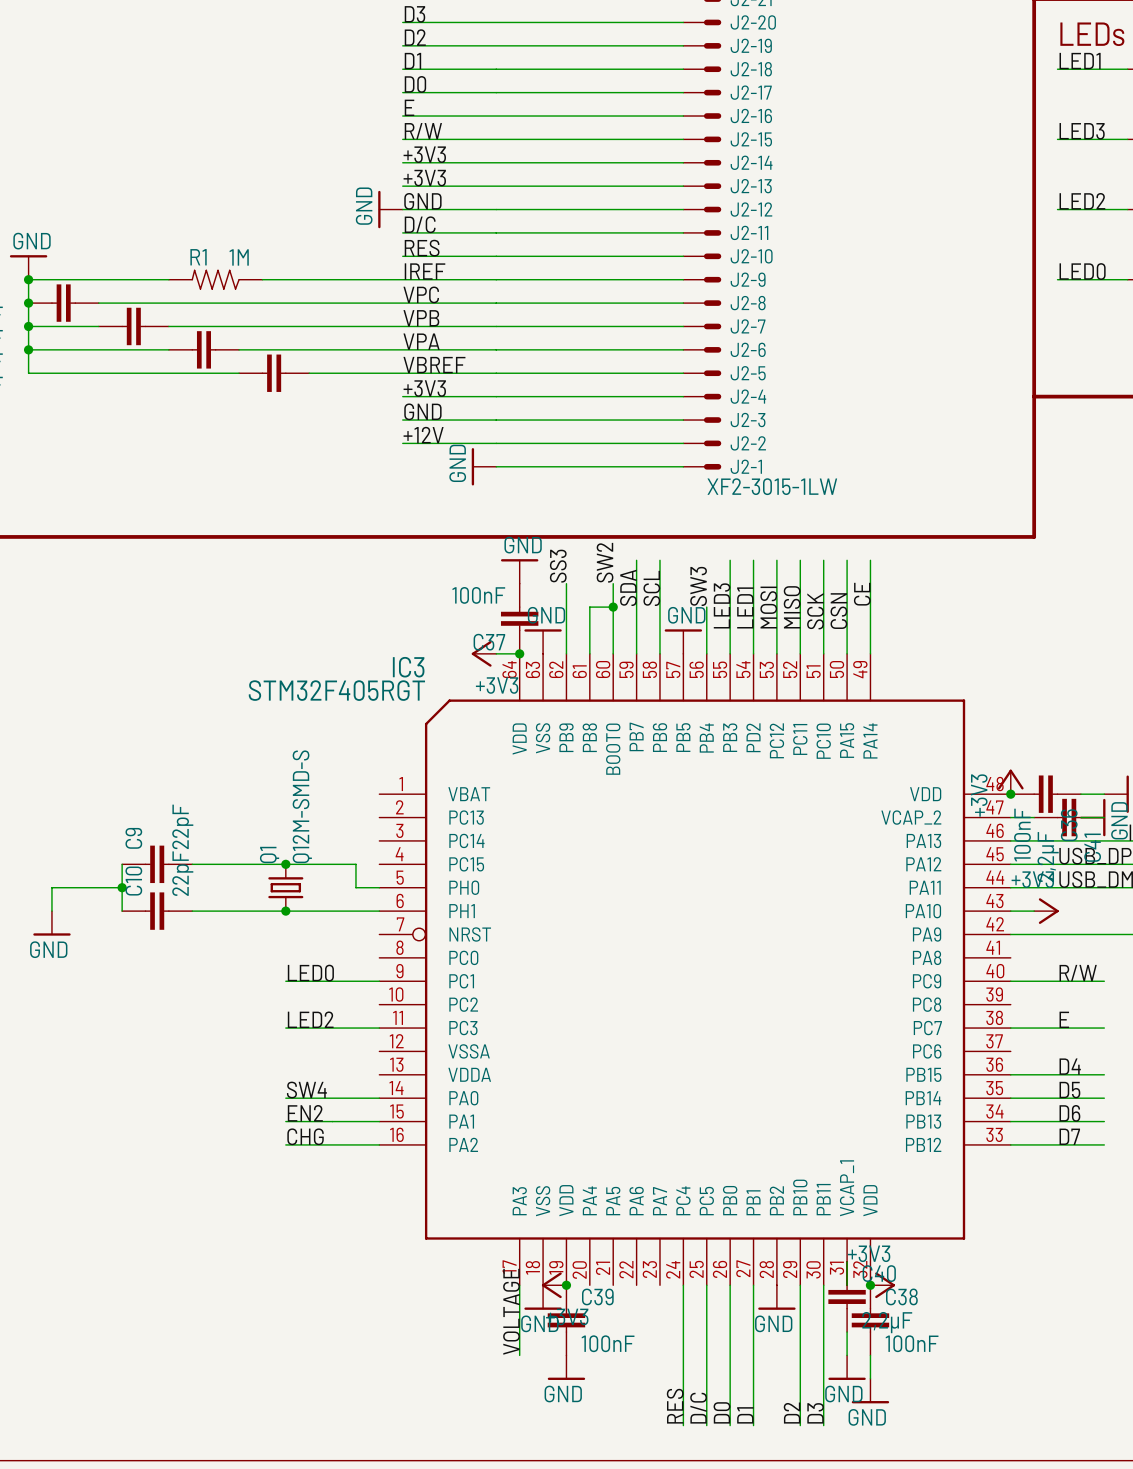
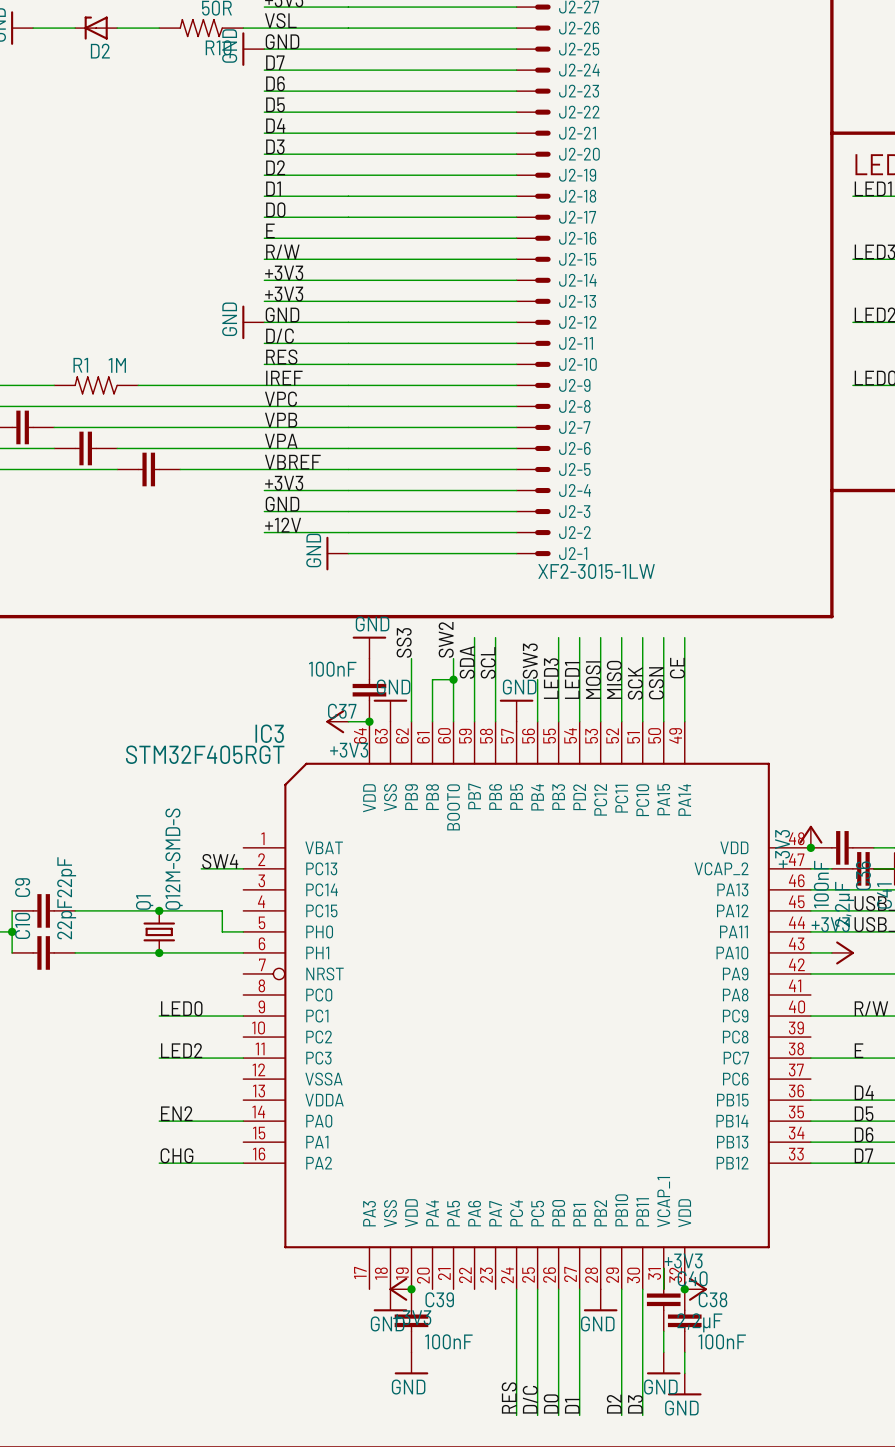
label: none -> SW4 (220, 861)
wire: none -> (201, 868) (243, 868)
label: SW4 (306, 1090) -> EN2 (176, 1113)
label: EN2 (305, 1113) -> none
wire: (285, 1121) (379, 1121) -> none
wire: (519, 1285) (519, 1355) -> none
label: VOLTAGE (511, 1311) -> none

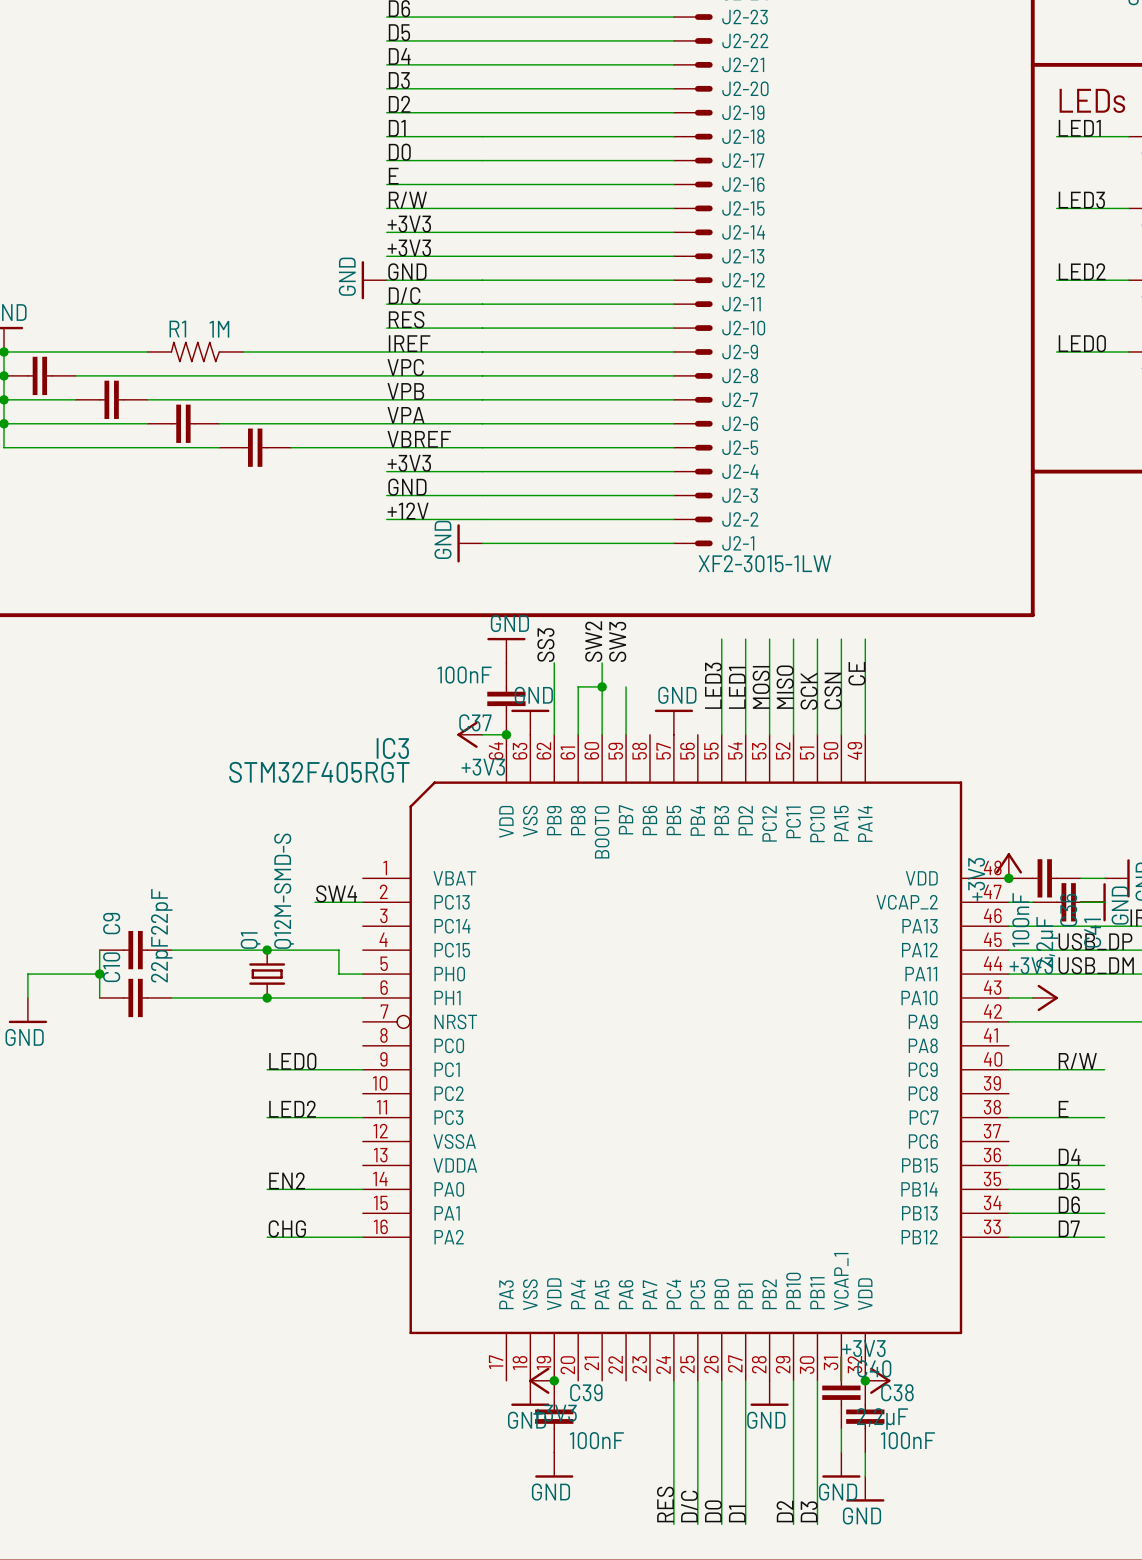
wire: (474, 637) (474, 679) -> none
wire: (495, 637) (495, 721) -> none
label position: SW3 (530, 661) -> SW3 (617, 641)
label: SDA (467, 662) -> none
label: SCL (488, 662) -> none
wire: (537, 679) (537, 721) -> none

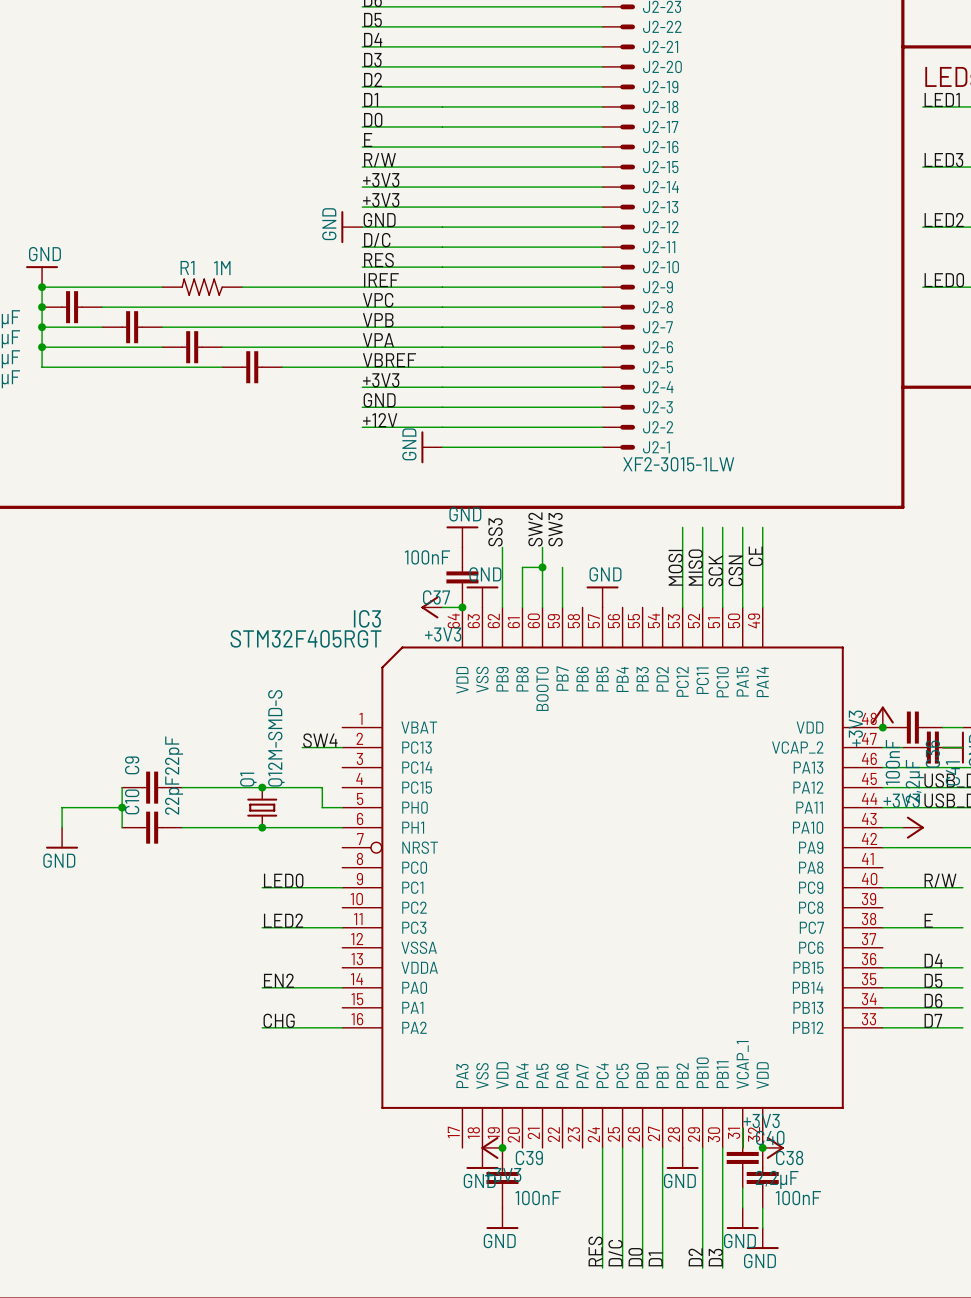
wire: (721, 639) (721, 734) -> none
wire: (745, 639) (745, 734) -> none
label: LED3 (713, 685) -> none
label: LED1 (737, 687) -> none

